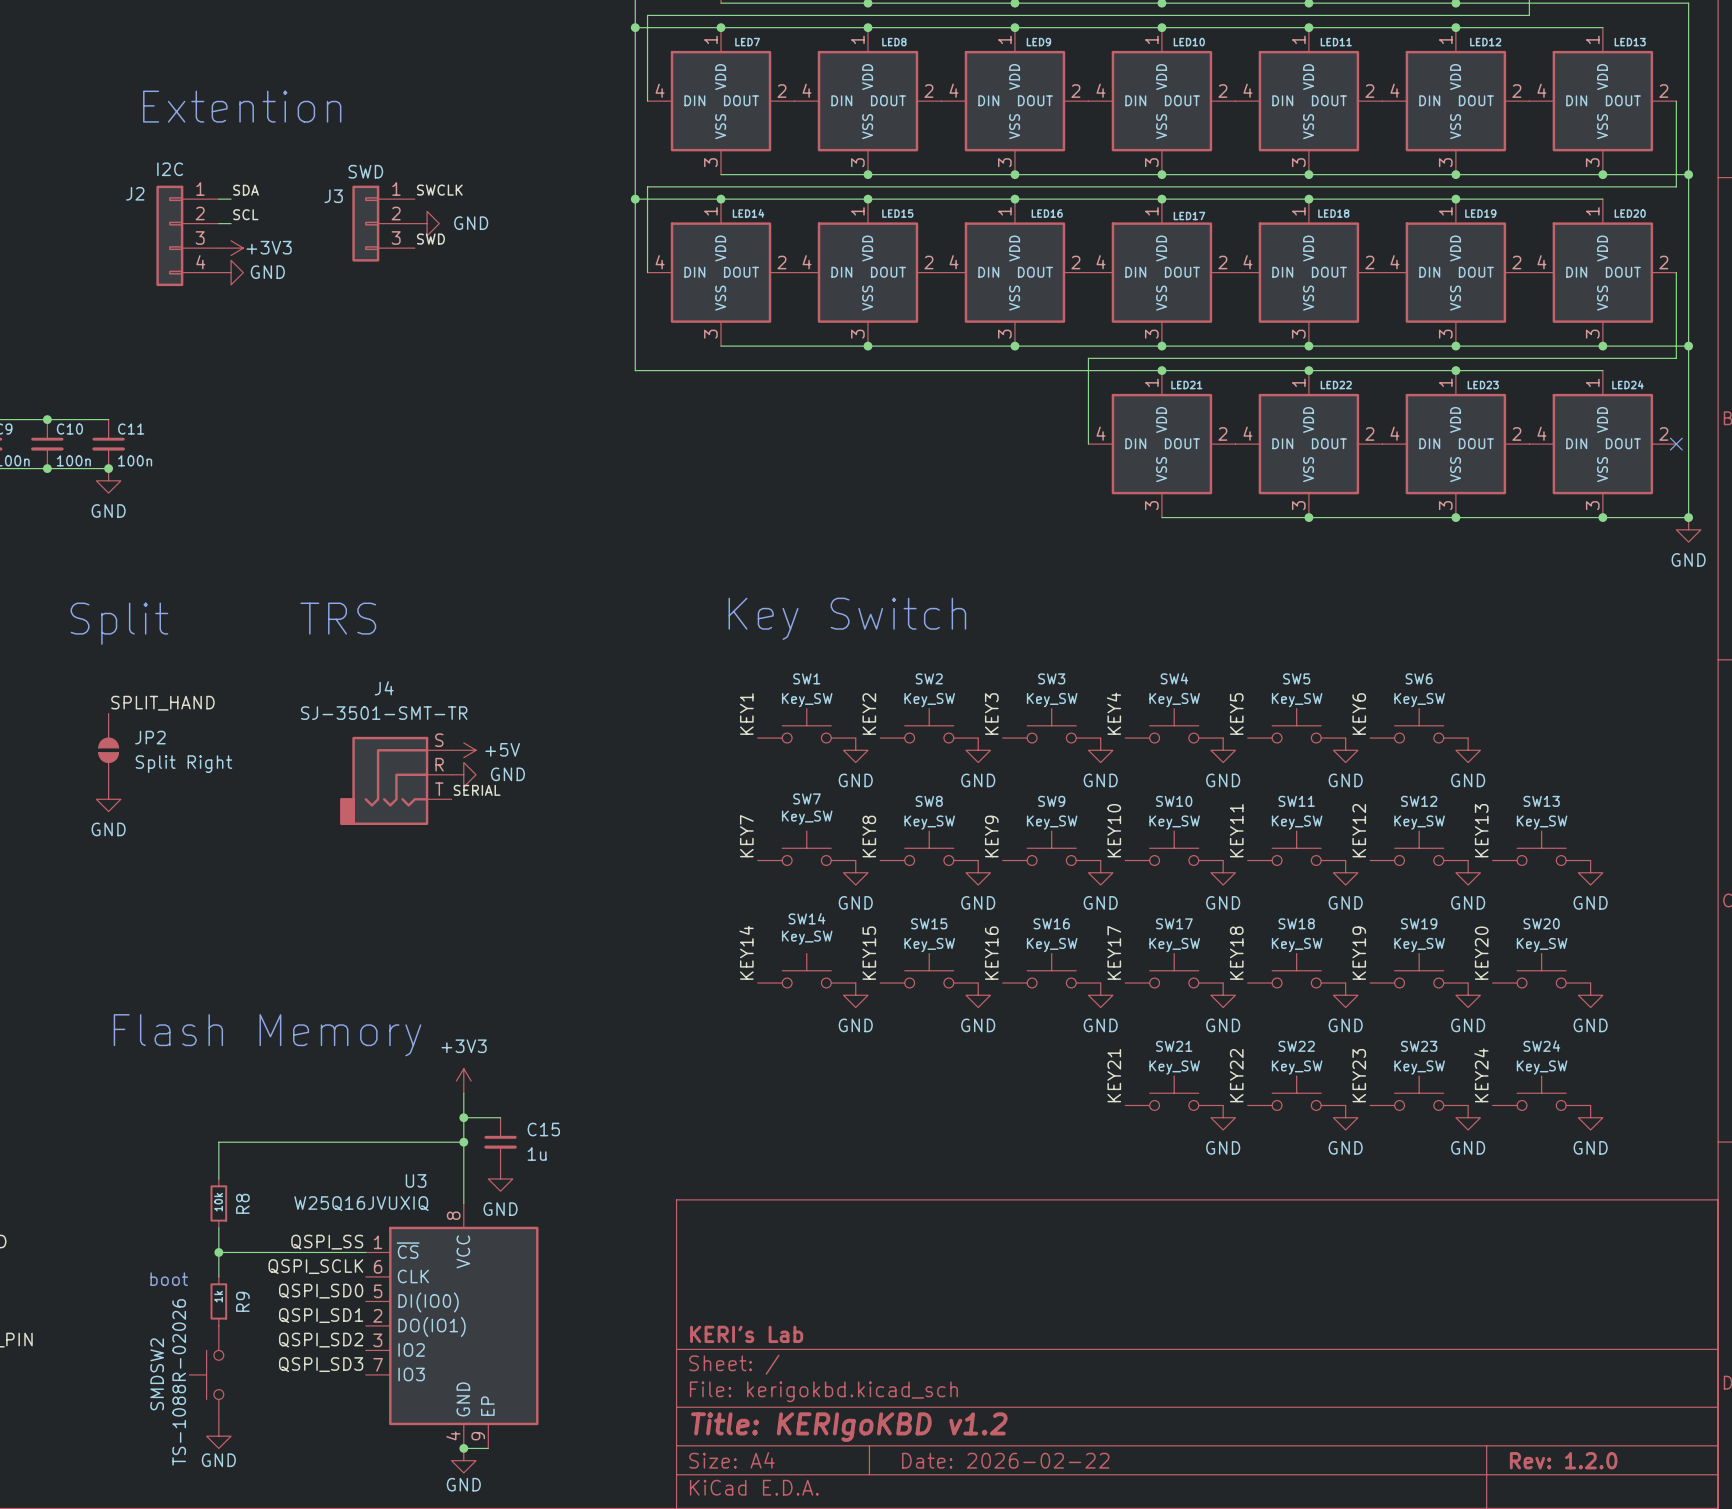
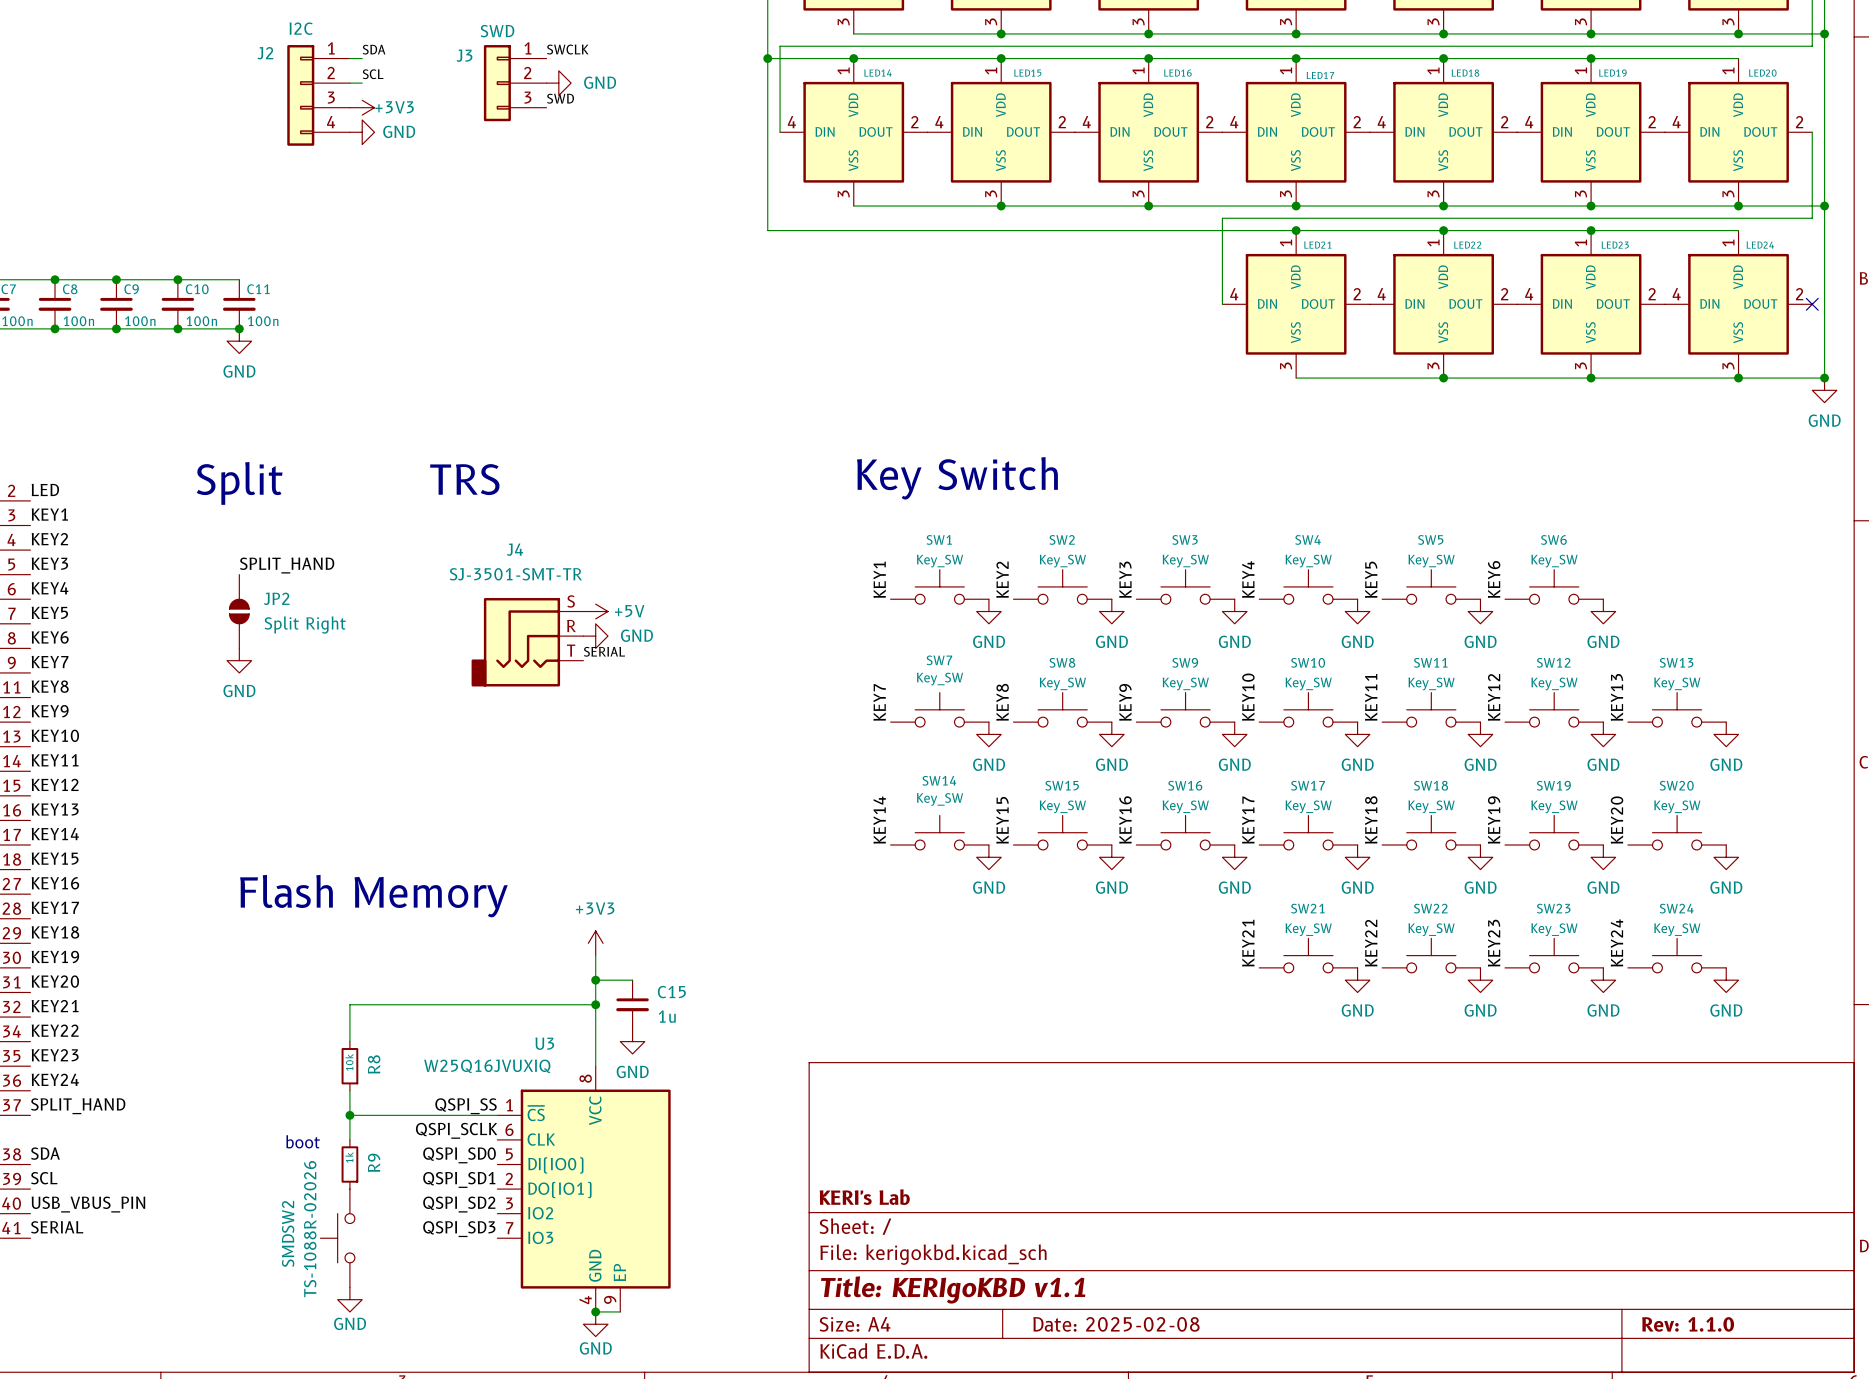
title block: Title: KERIgoKBD v1.2 (849, 1427) -> Title: KERIgoKBD v1.1 (953, 1289)
title block: Date: 2026-02-22 (1005, 1460) -> Date: 2025-02-08 (1116, 1324)
title block: Rev: 1.2.0 (1563, 1460) -> Rev: 1.1.0 (1688, 1324)

